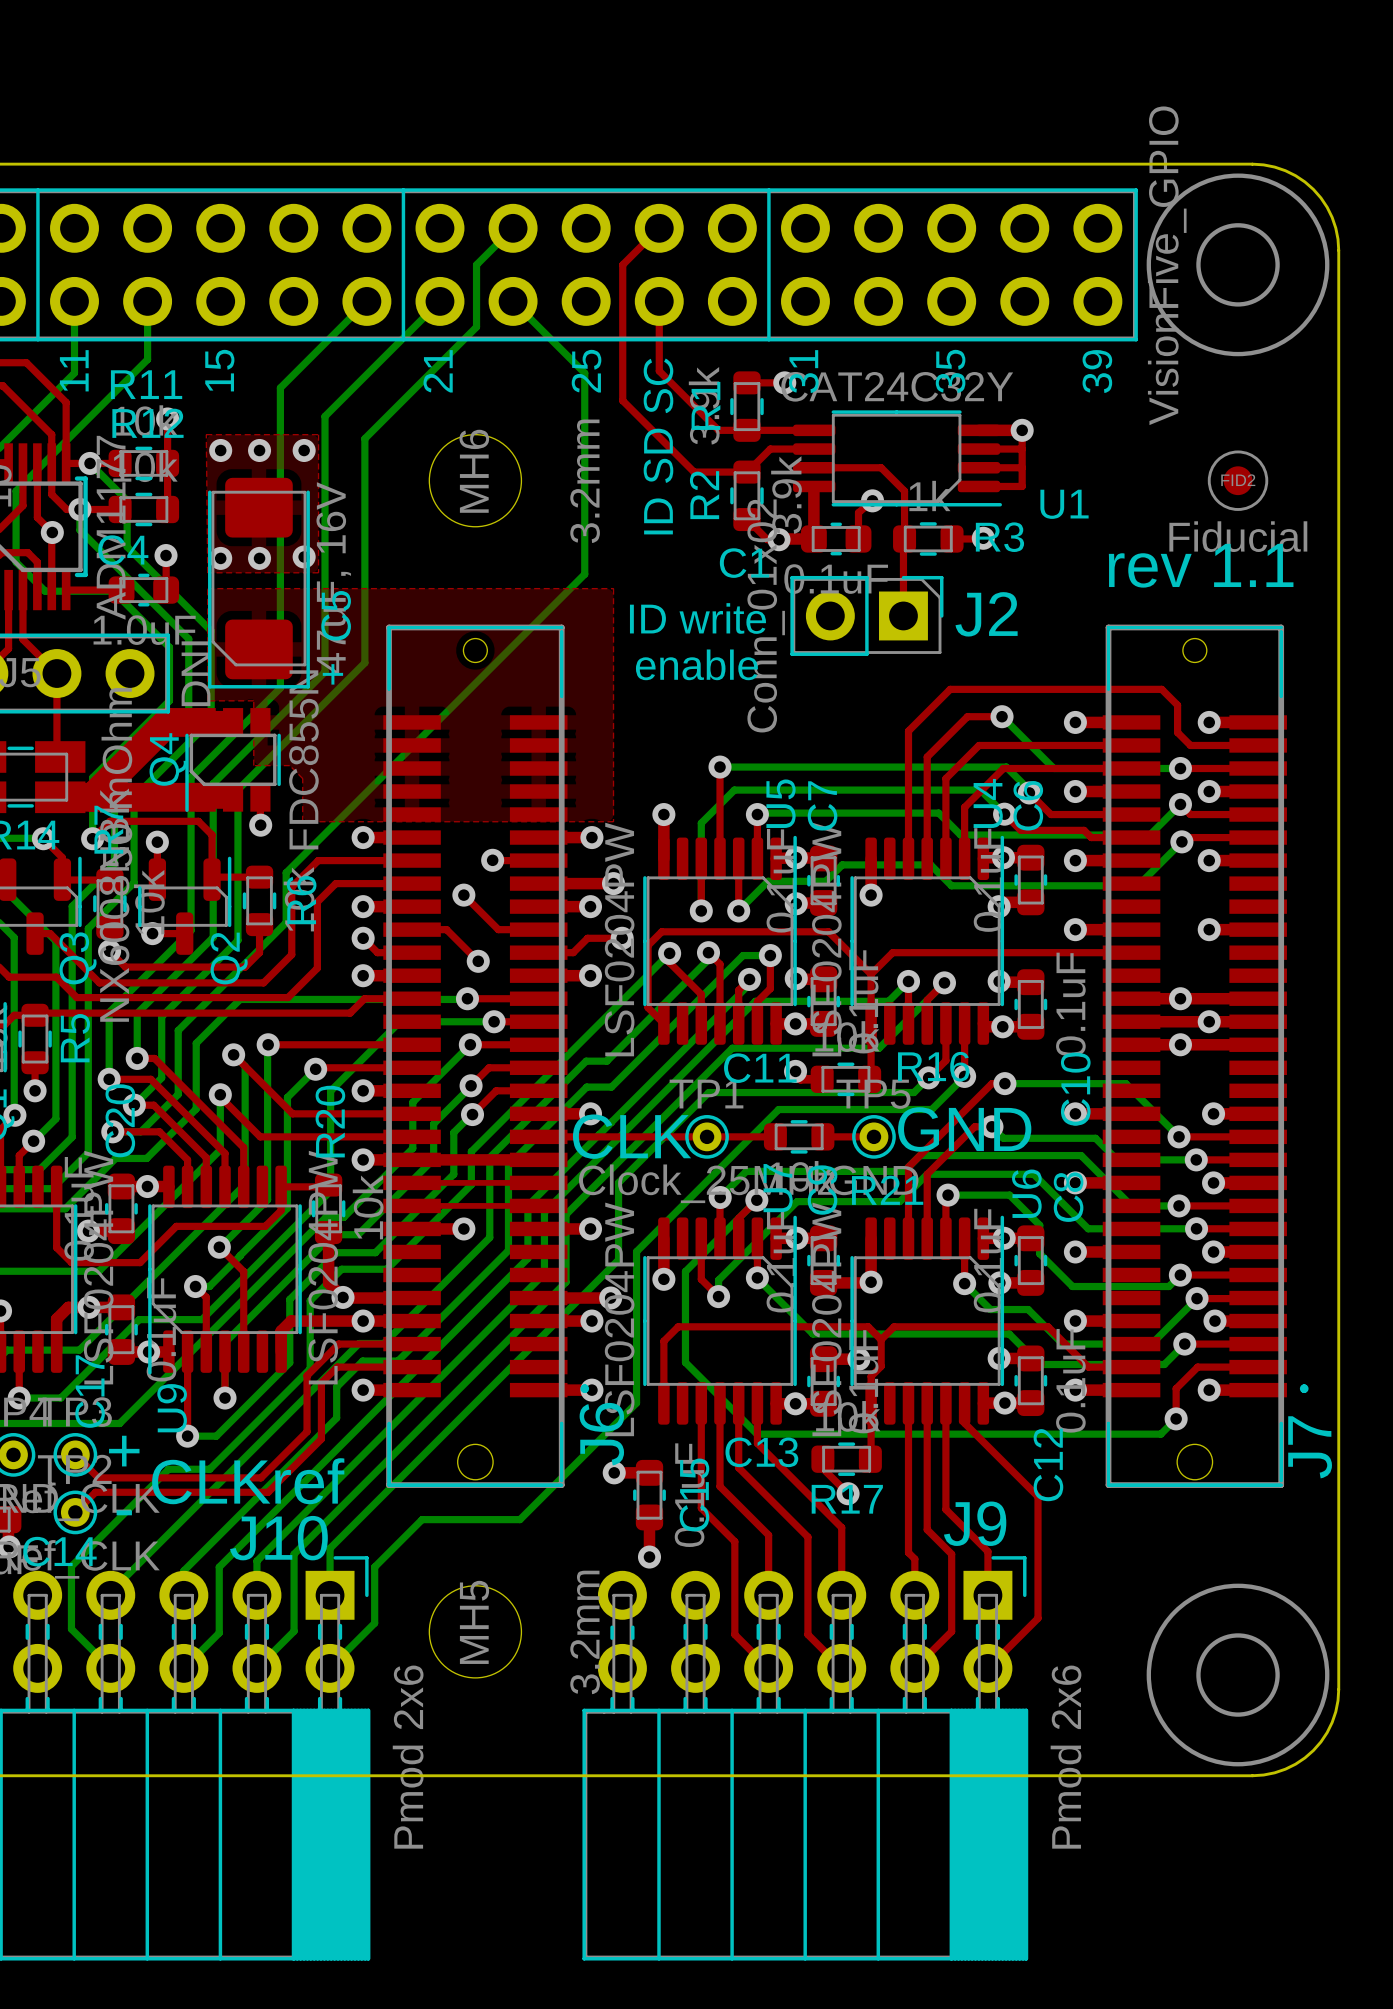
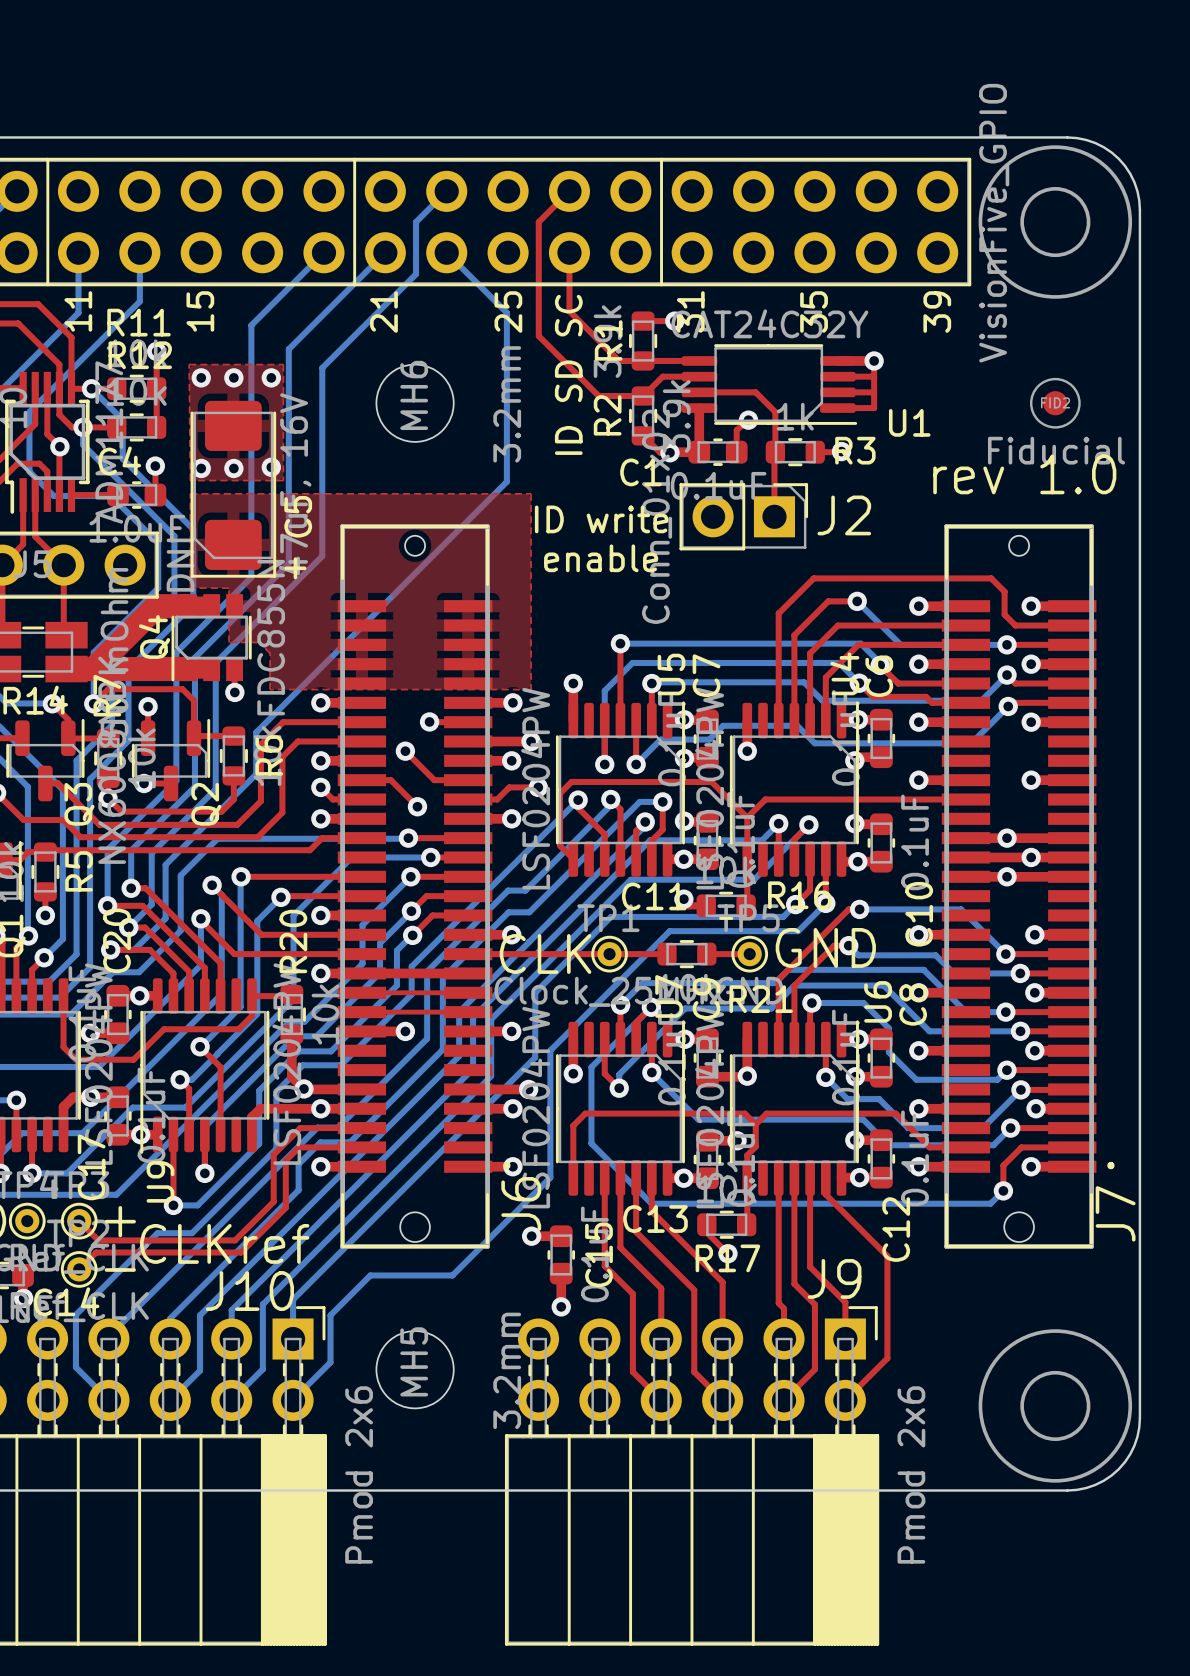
text: rev 1.1 (1201, 565) -> rev 1.0 (1024, 474)

